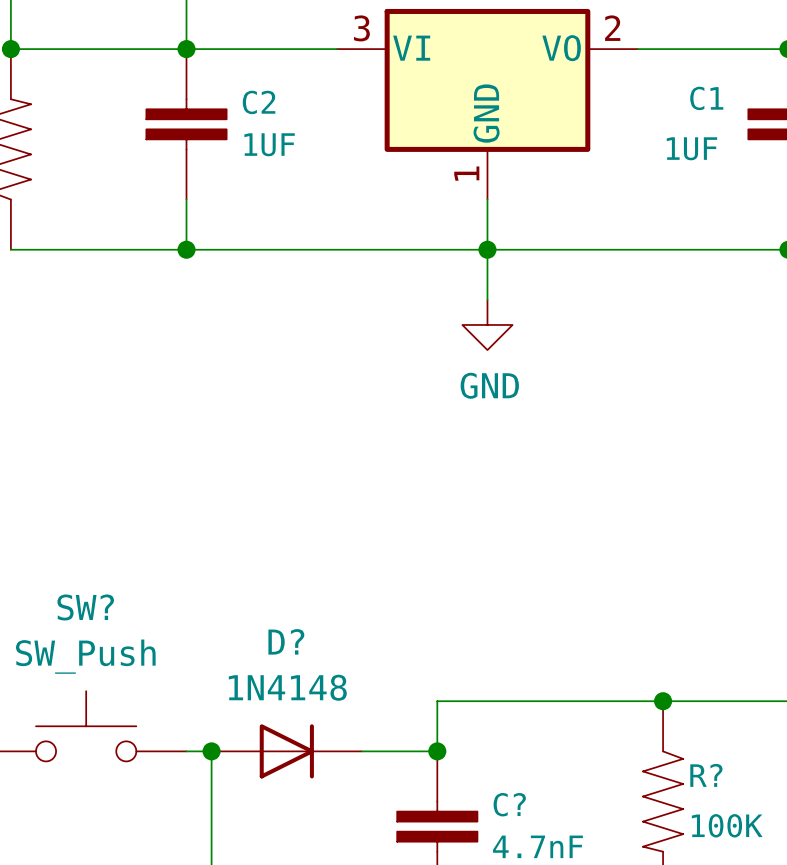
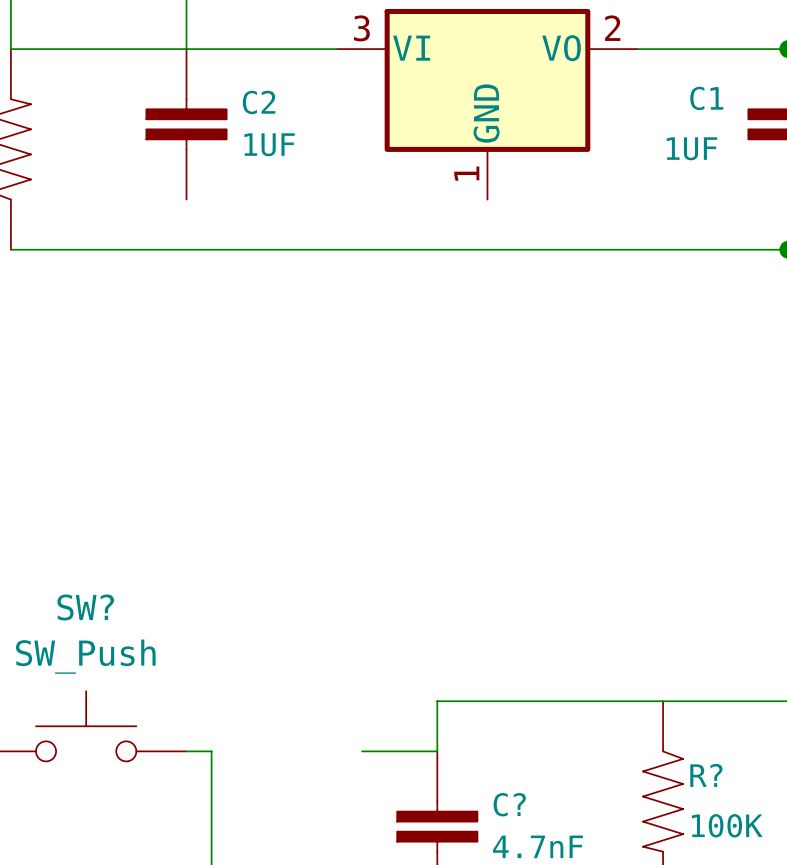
junction: (10, 49) -> none
junction: (186, 49) -> none
wire: (186, 199) (186, 249) -> none
wire: (487, 199) (487, 299) -> none
junction: (186, 249) -> none
junction: (487, 249) -> none
power symbol: GND (487, 324) -> none
junction: (663, 701) -> none
junction: (211, 751) -> none
D?: 1N4148 (286, 751) -> none
junction: (437, 751) -> none

